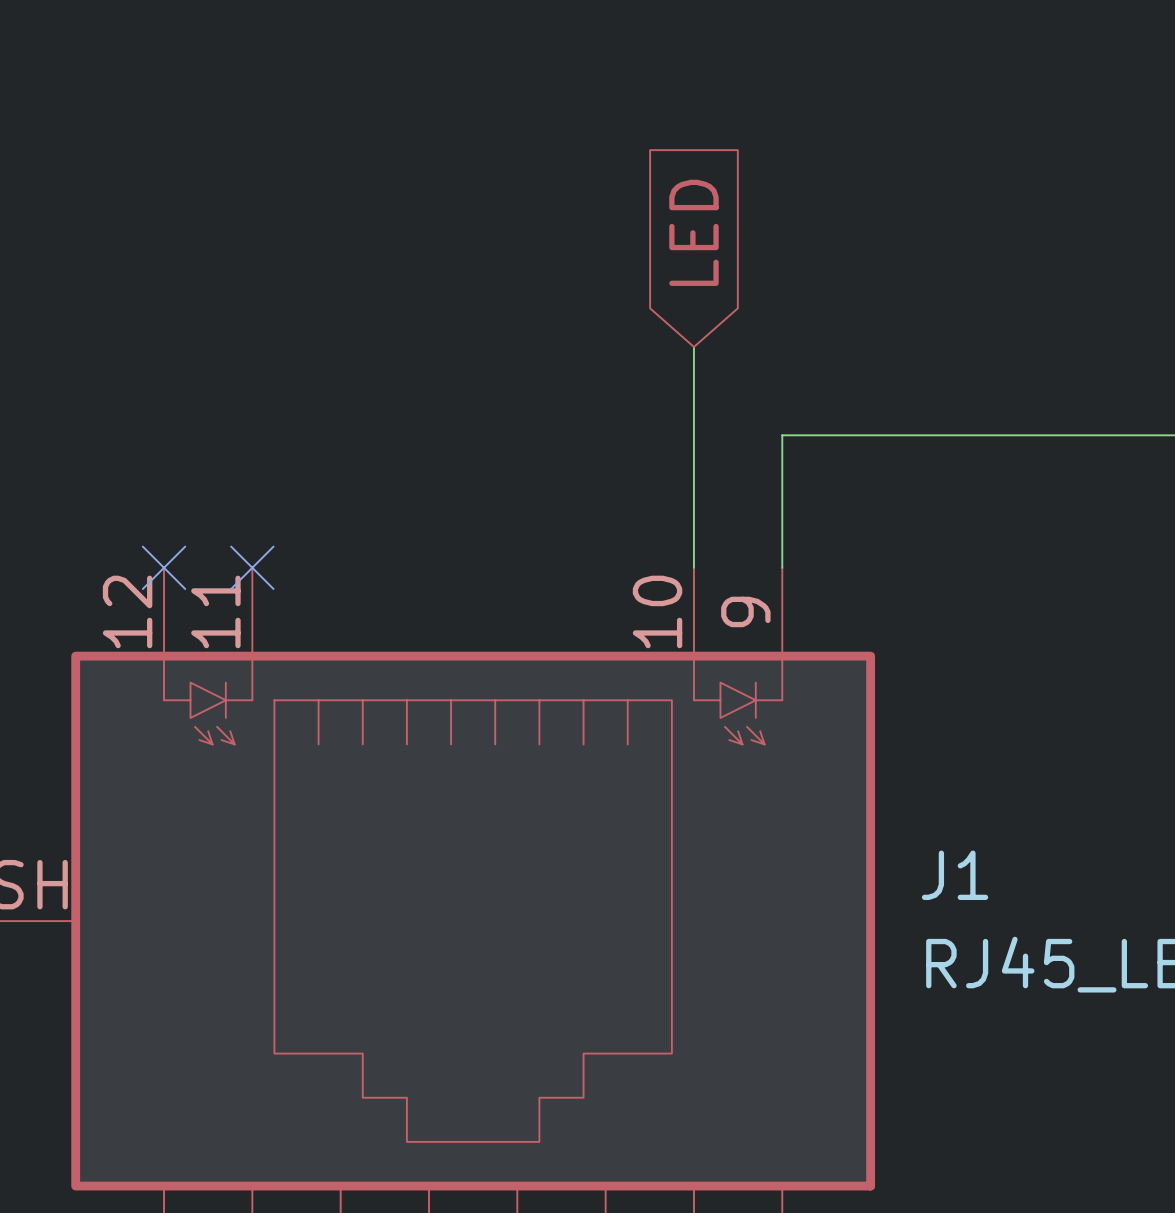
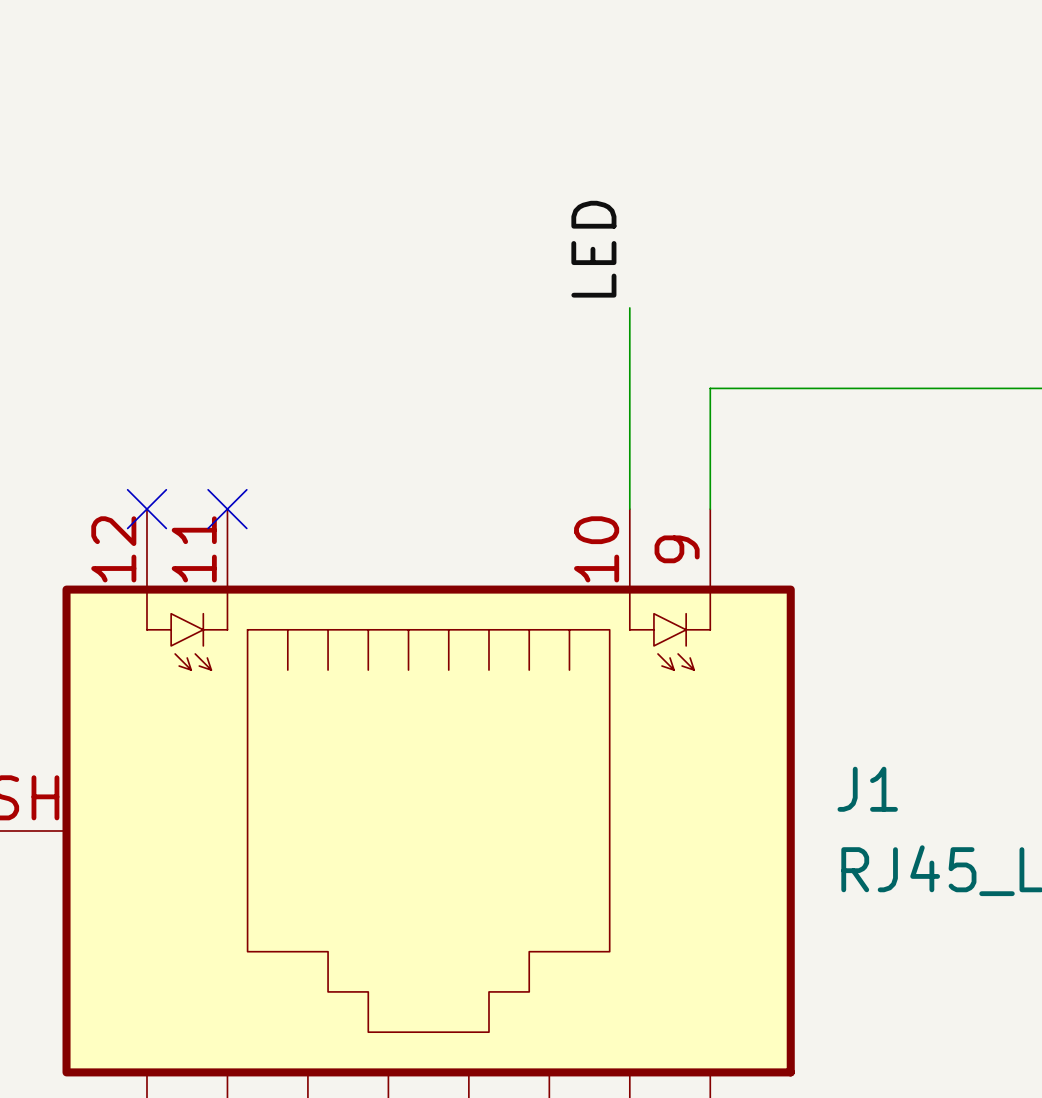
global label: LED (693, 232) -> none
label: none -> LED (593, 249)

